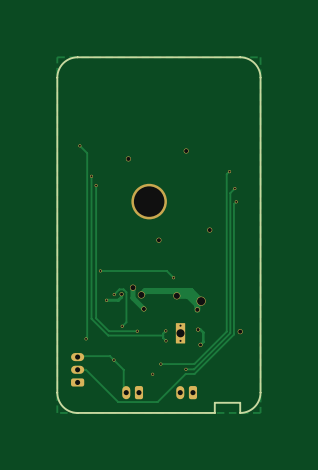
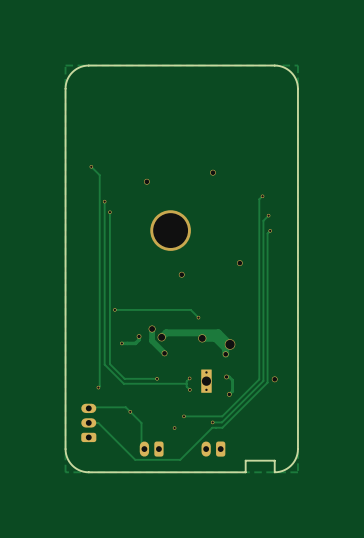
track: (114, 294) (119, 289) (123, 289) (126, 292) (126, 322) (122, 326) -> none
via: (114, 294) -> none
via: (122, 326) -> none

